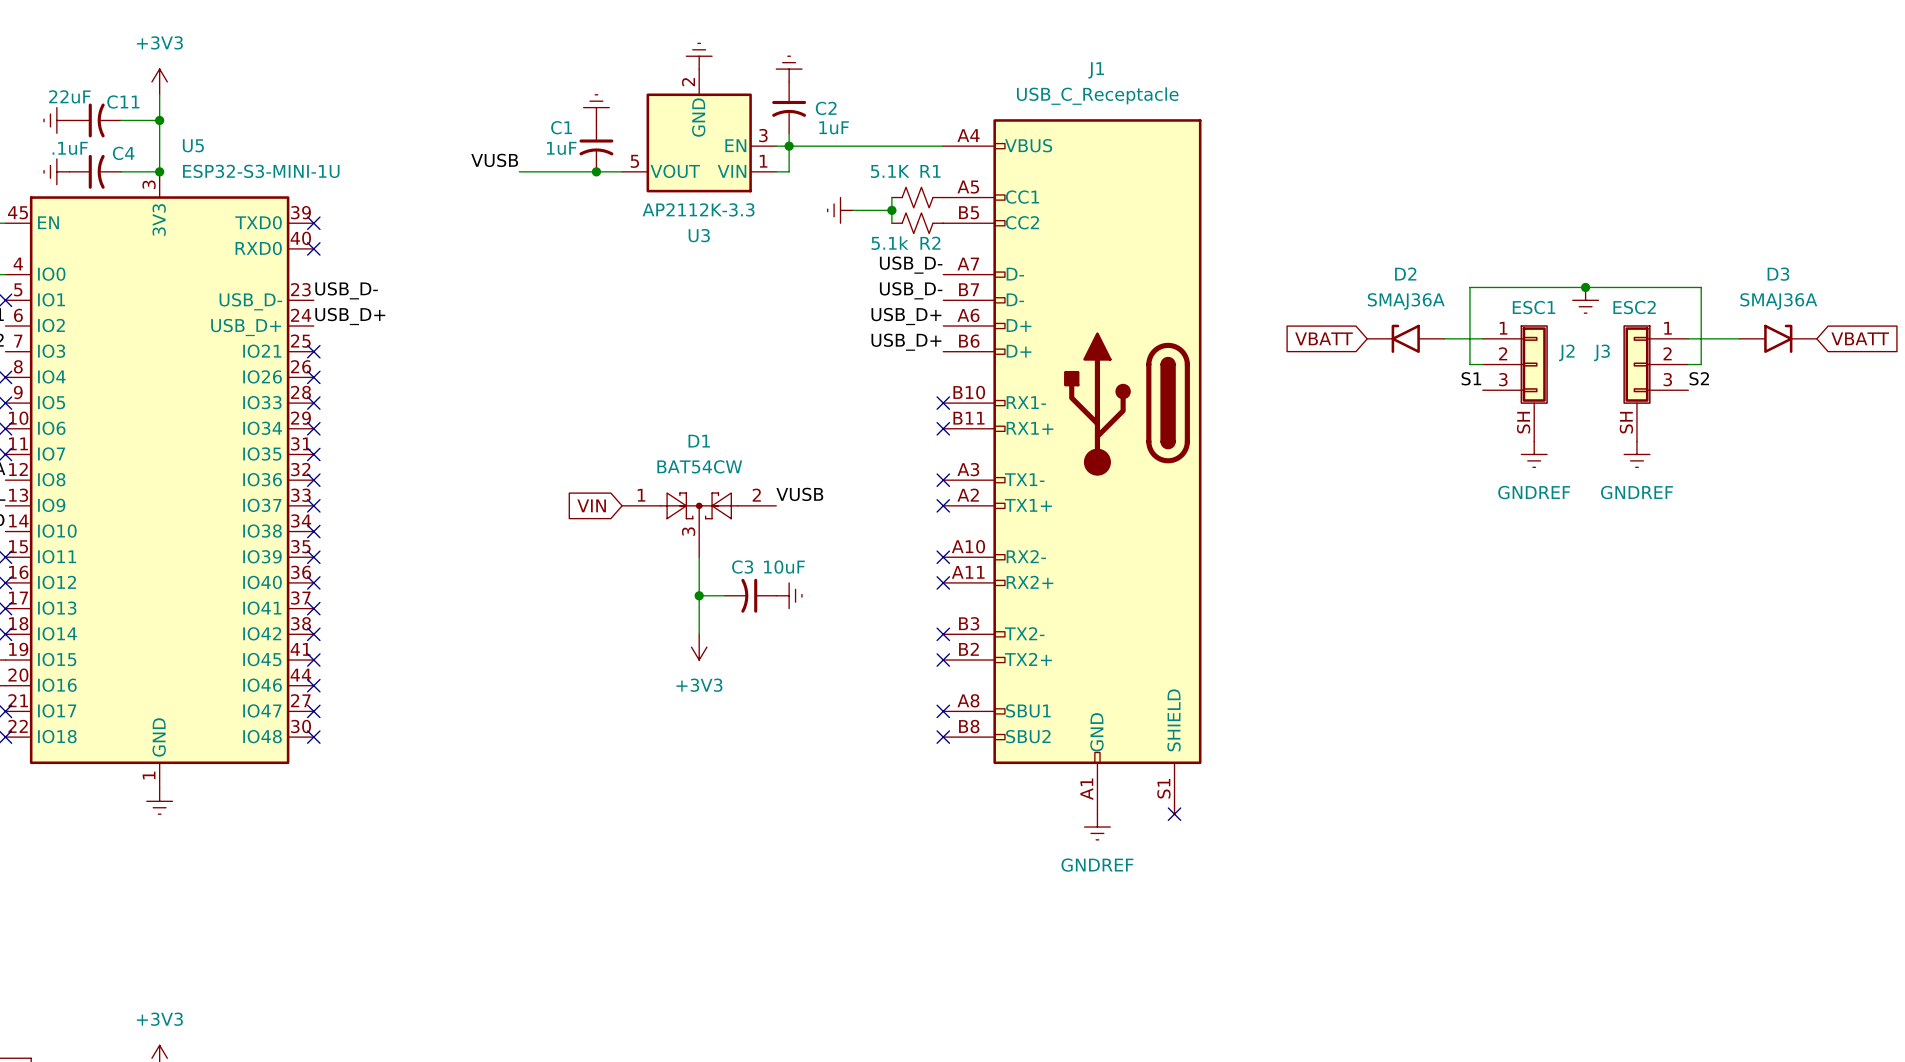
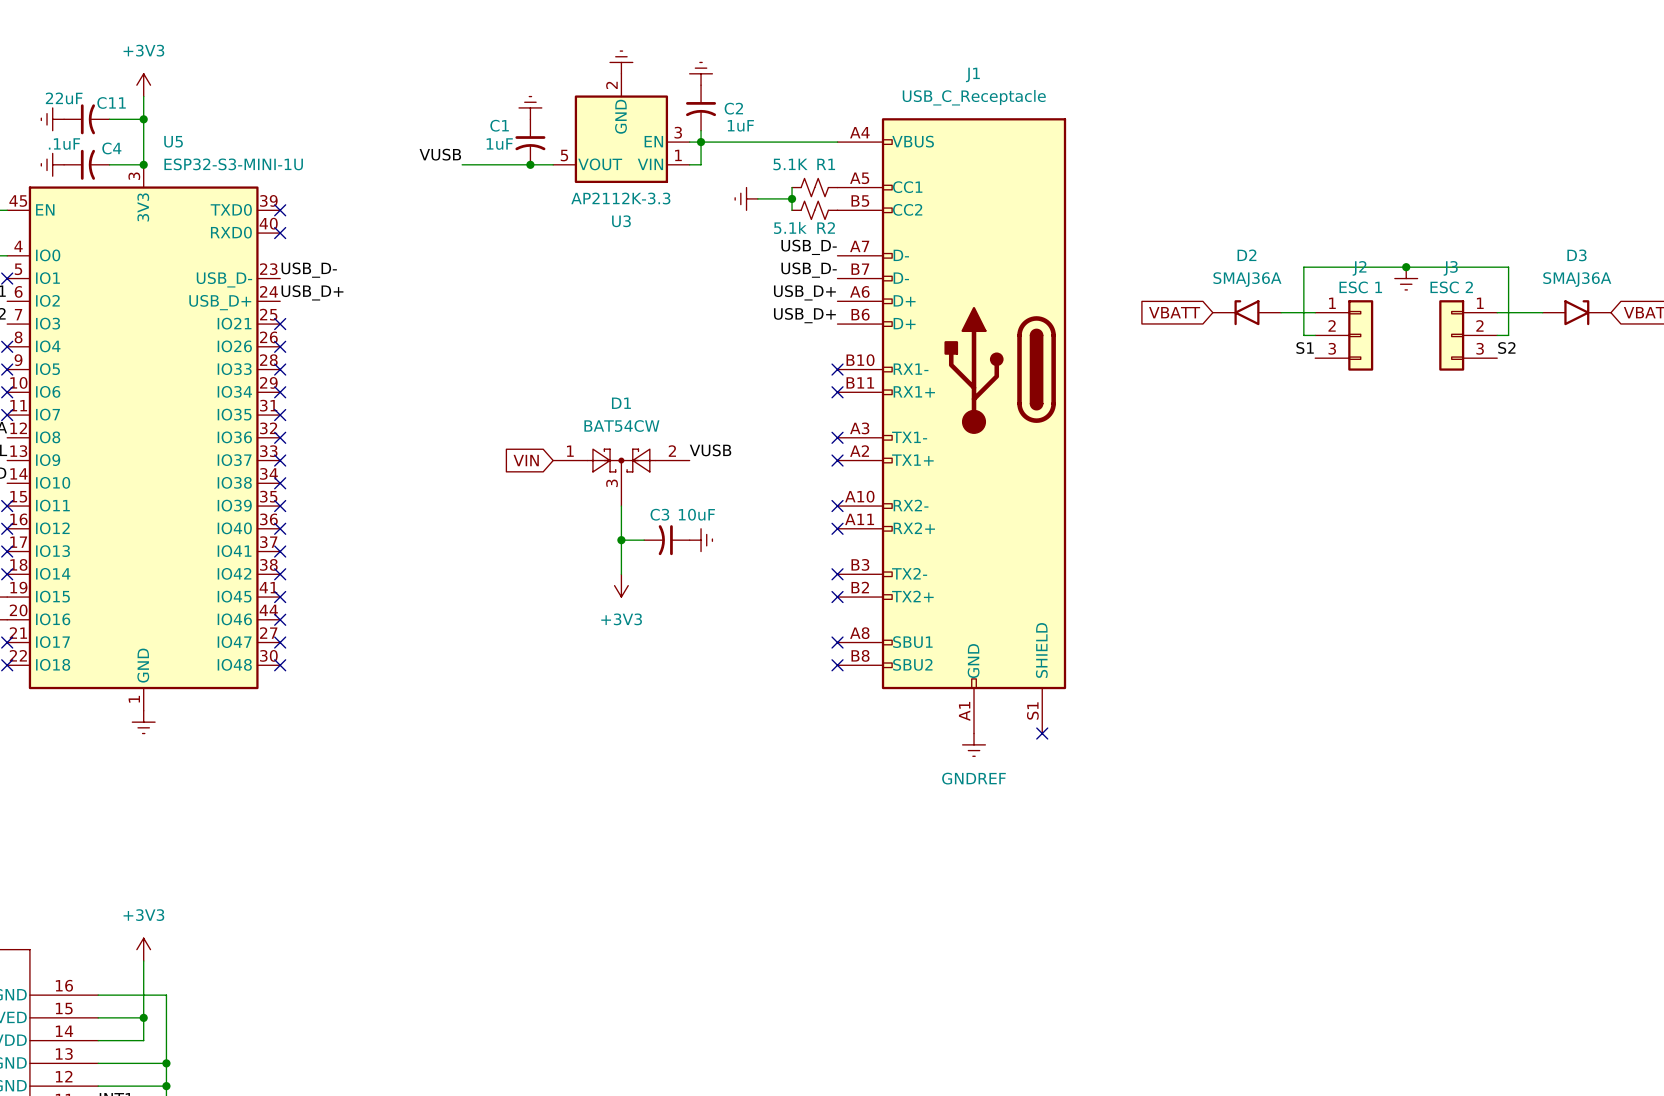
J2 value: ESC1 (1534, 307) -> ESC 1 (1360, 287)
J3 value: ESC2 (1634, 307) -> ESC 2 (1451, 287)
J2 symbol: [1482, 325, 1548, 442] -> [1315, 300, 1374, 371]
J3 symbol: [1623, 325, 1689, 442] -> [1439, 300, 1498, 371]
J2 name position: J2 (1566, 352) -> J2 (1359, 268)
J3 name position: J3 (1601, 352) -> J3 (1450, 268)
power symbol: GNDREF (1534, 454) -> none
power symbol: GNDREF (1636, 454) -> none

